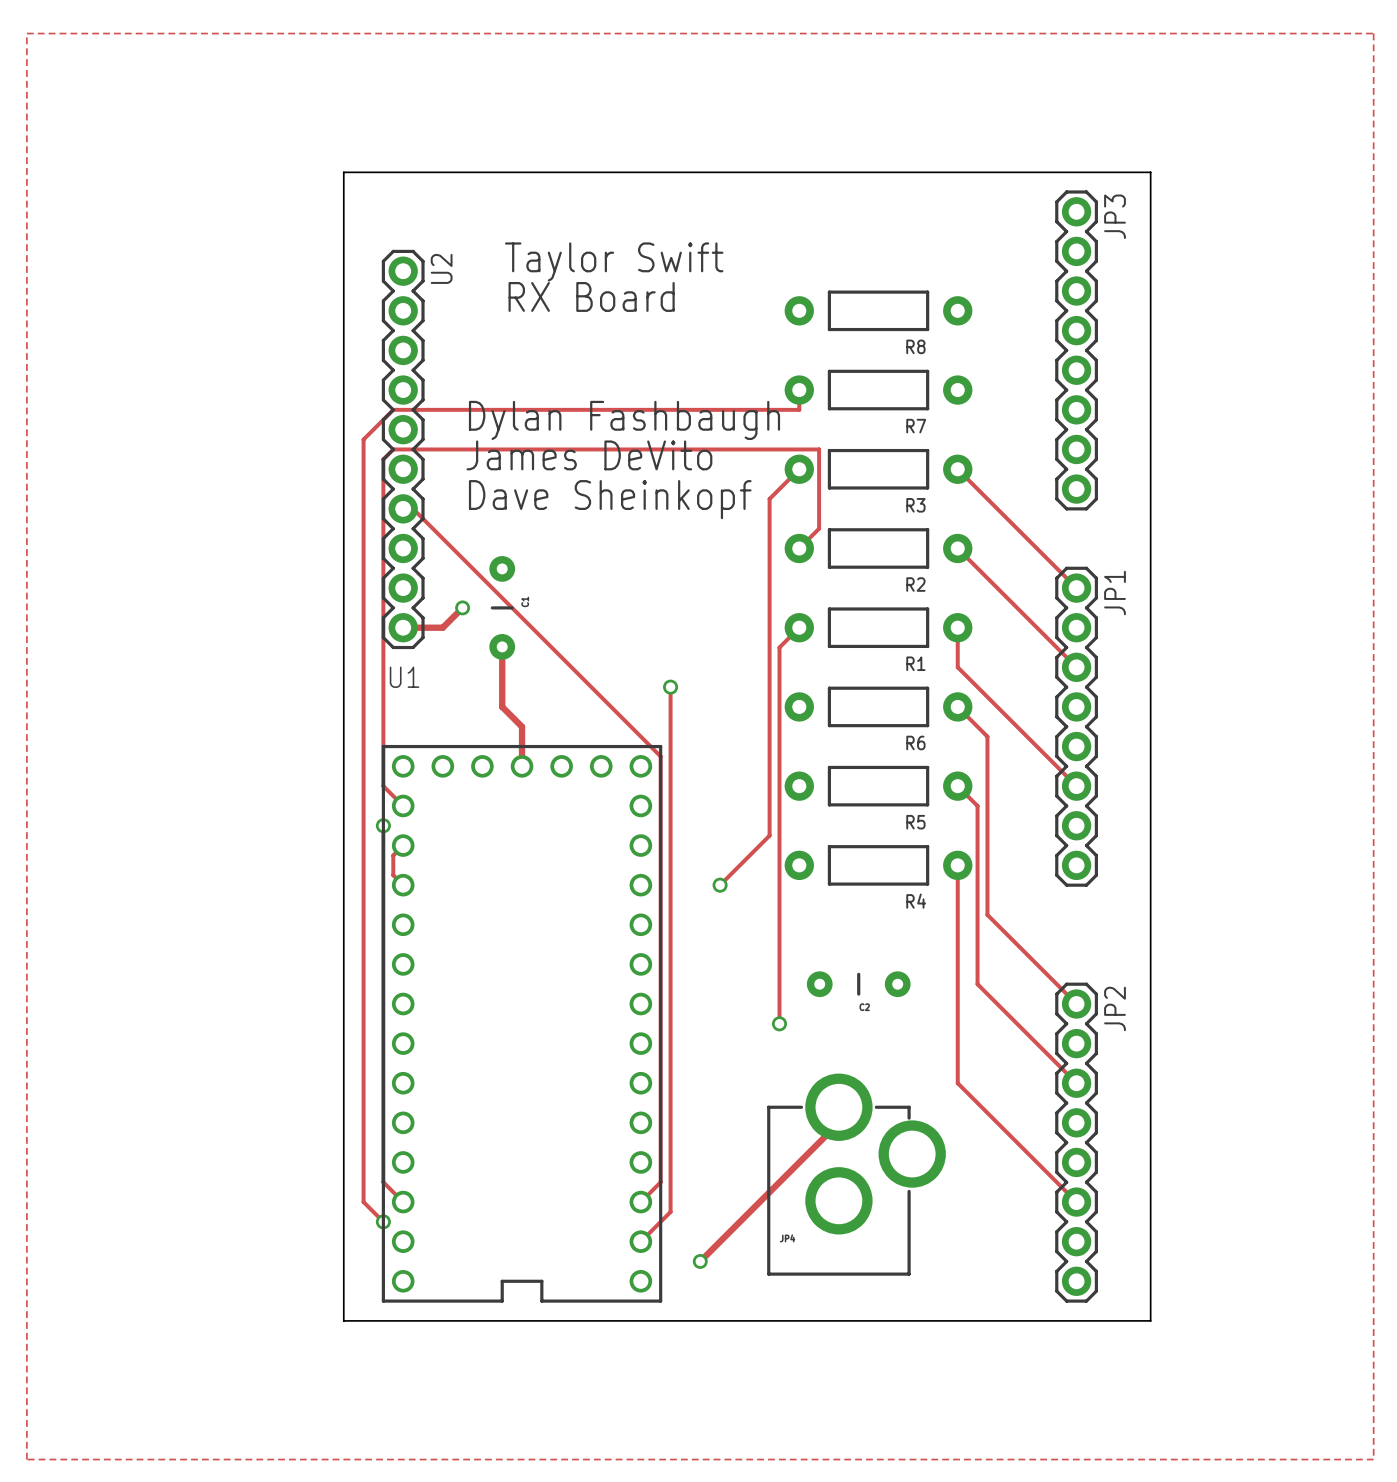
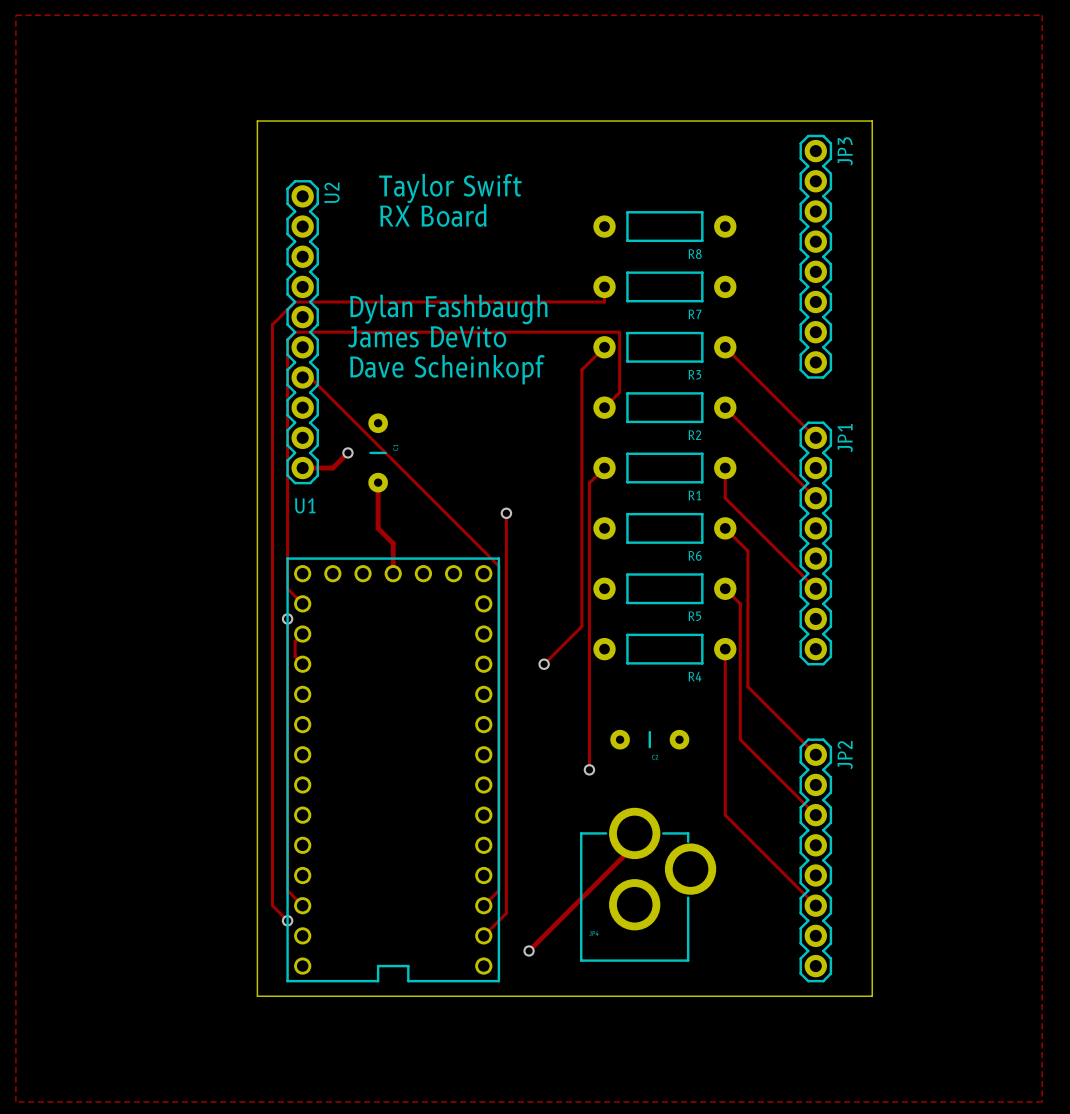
text: Dave Sheinkopf (610, 499) -> Dave Scheinkopf (447, 369)

